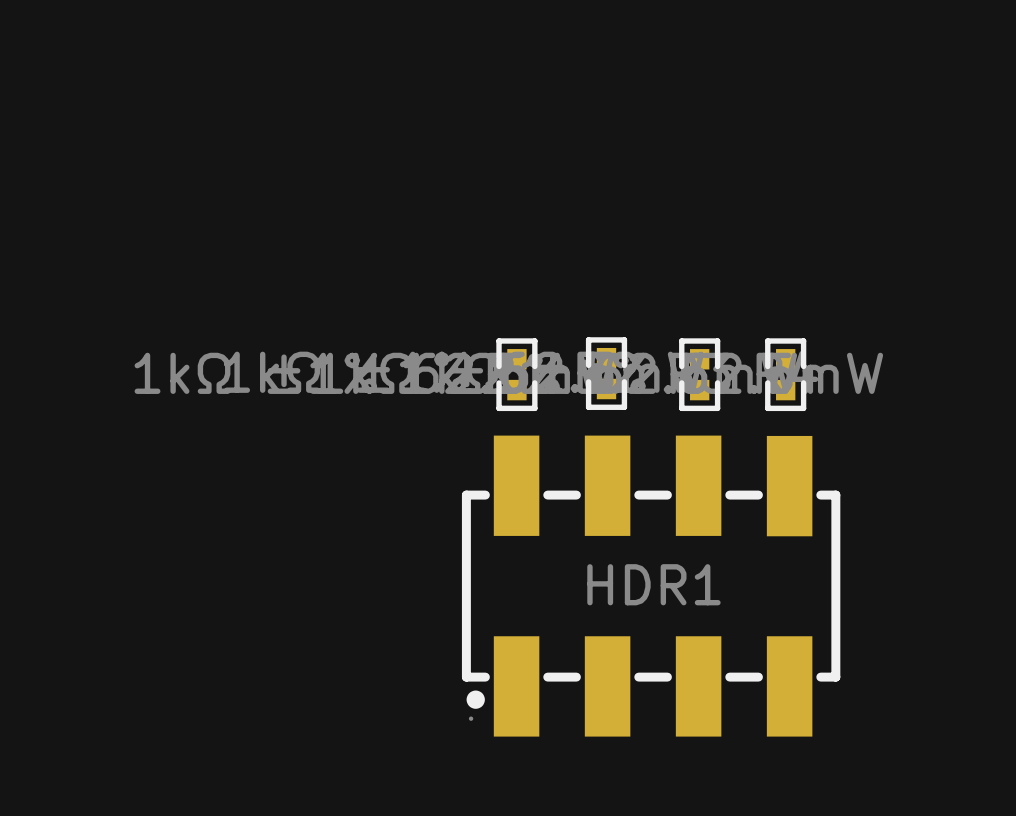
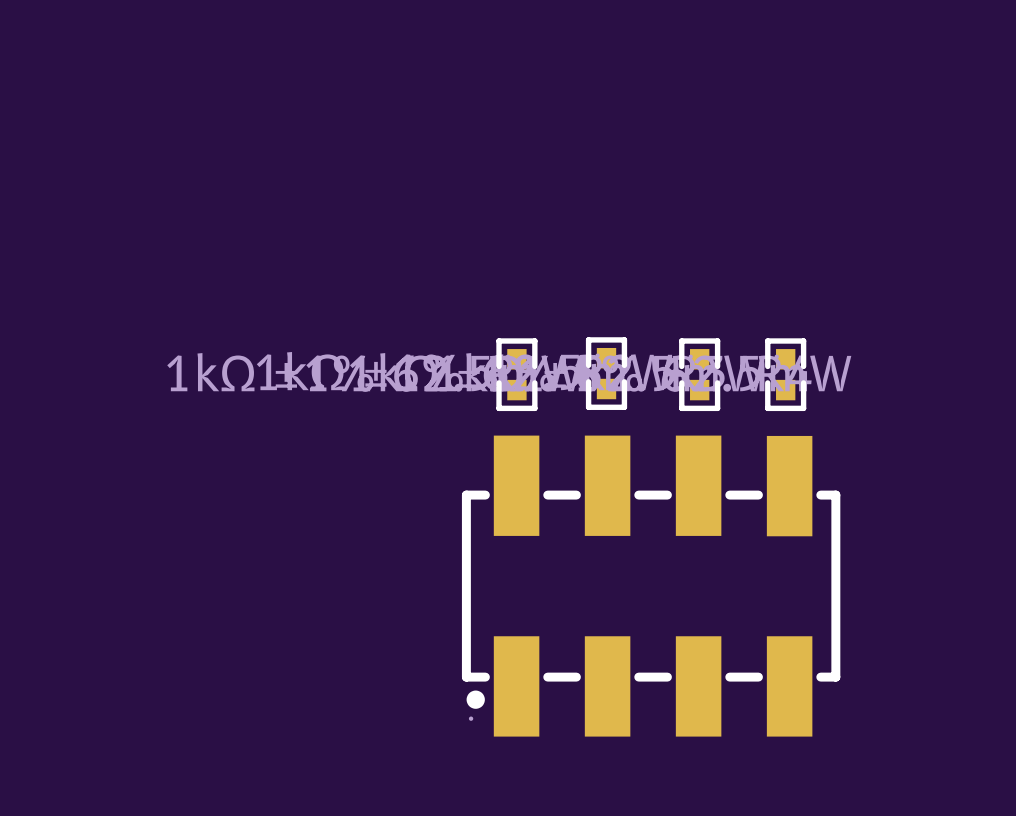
HDR1 name: HDR1 (653, 584) -> none

